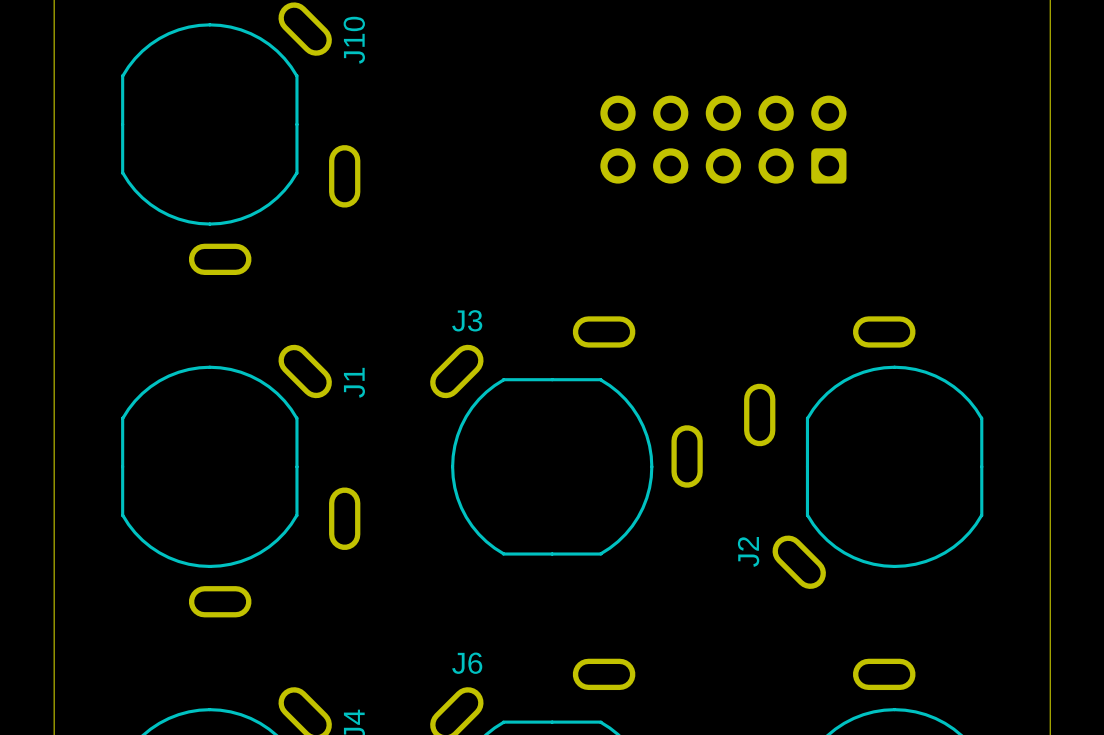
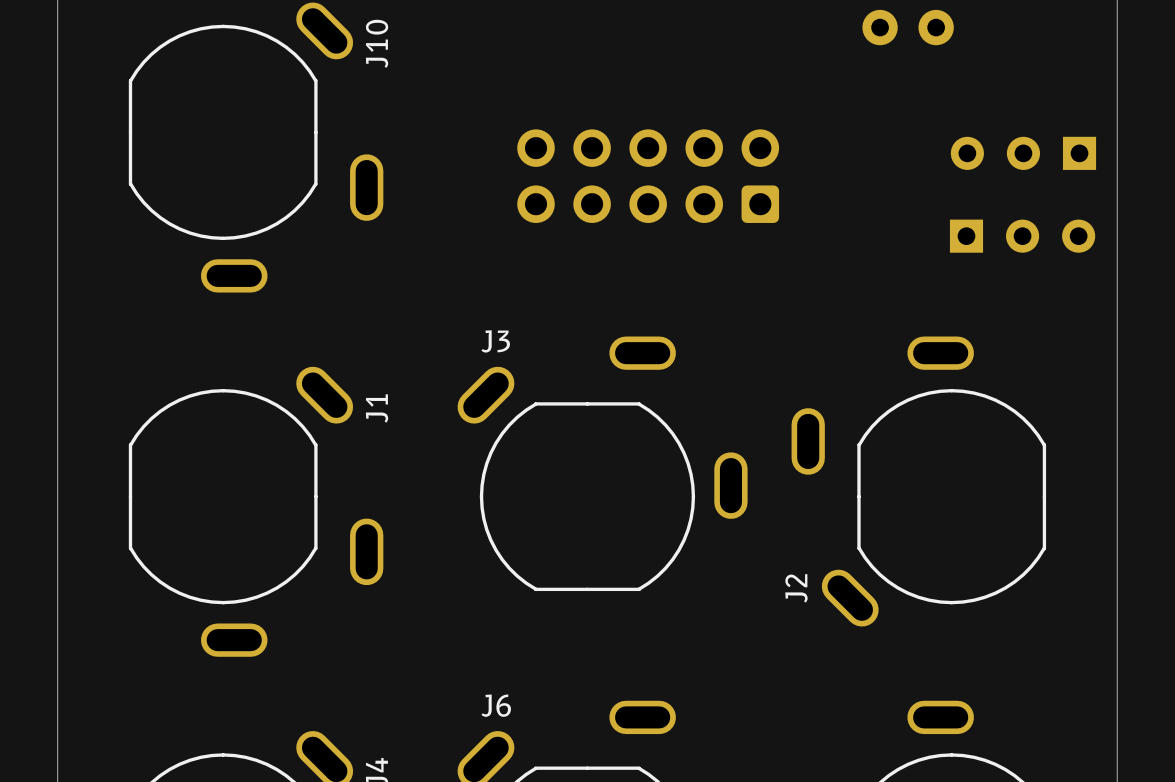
part: none -> (908, 27)
part position: (723, 139) -> (648, 176)
part: none -> (1023, 153)
part: none -> (1022, 236)

